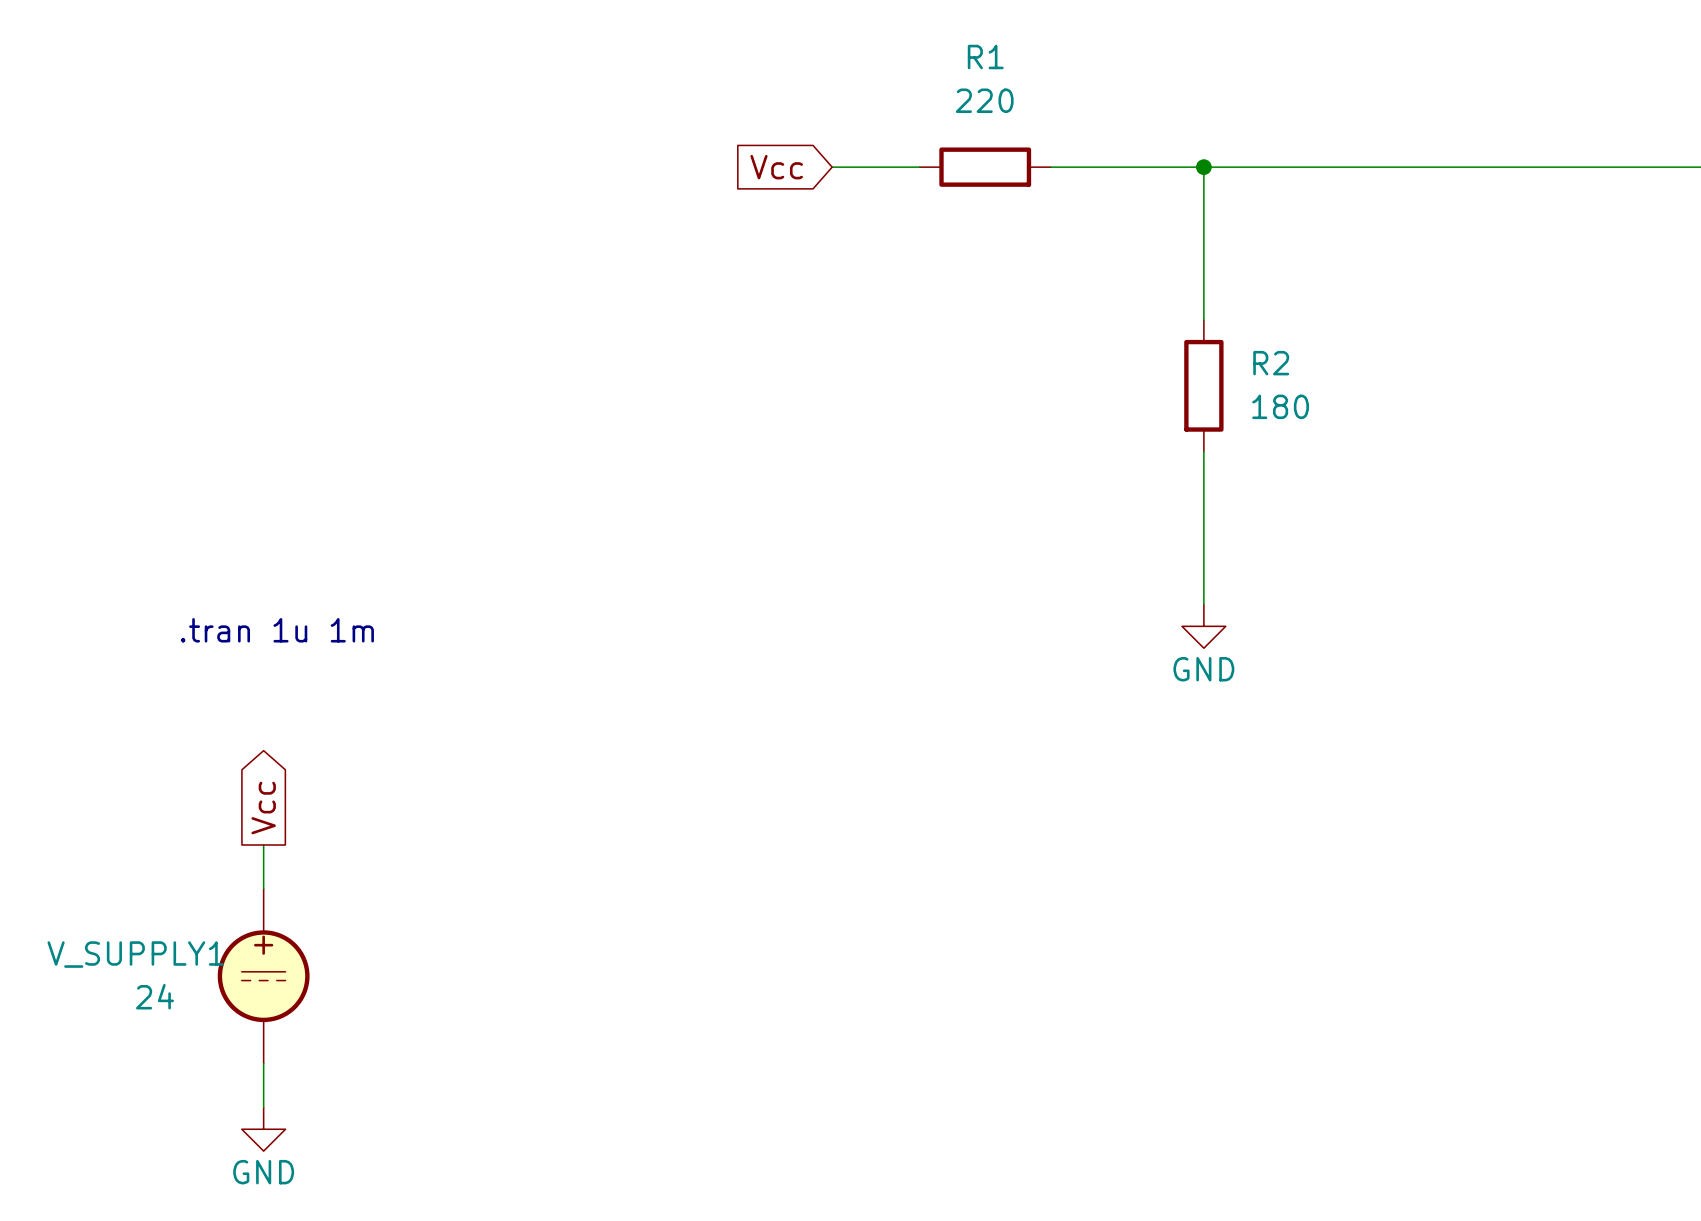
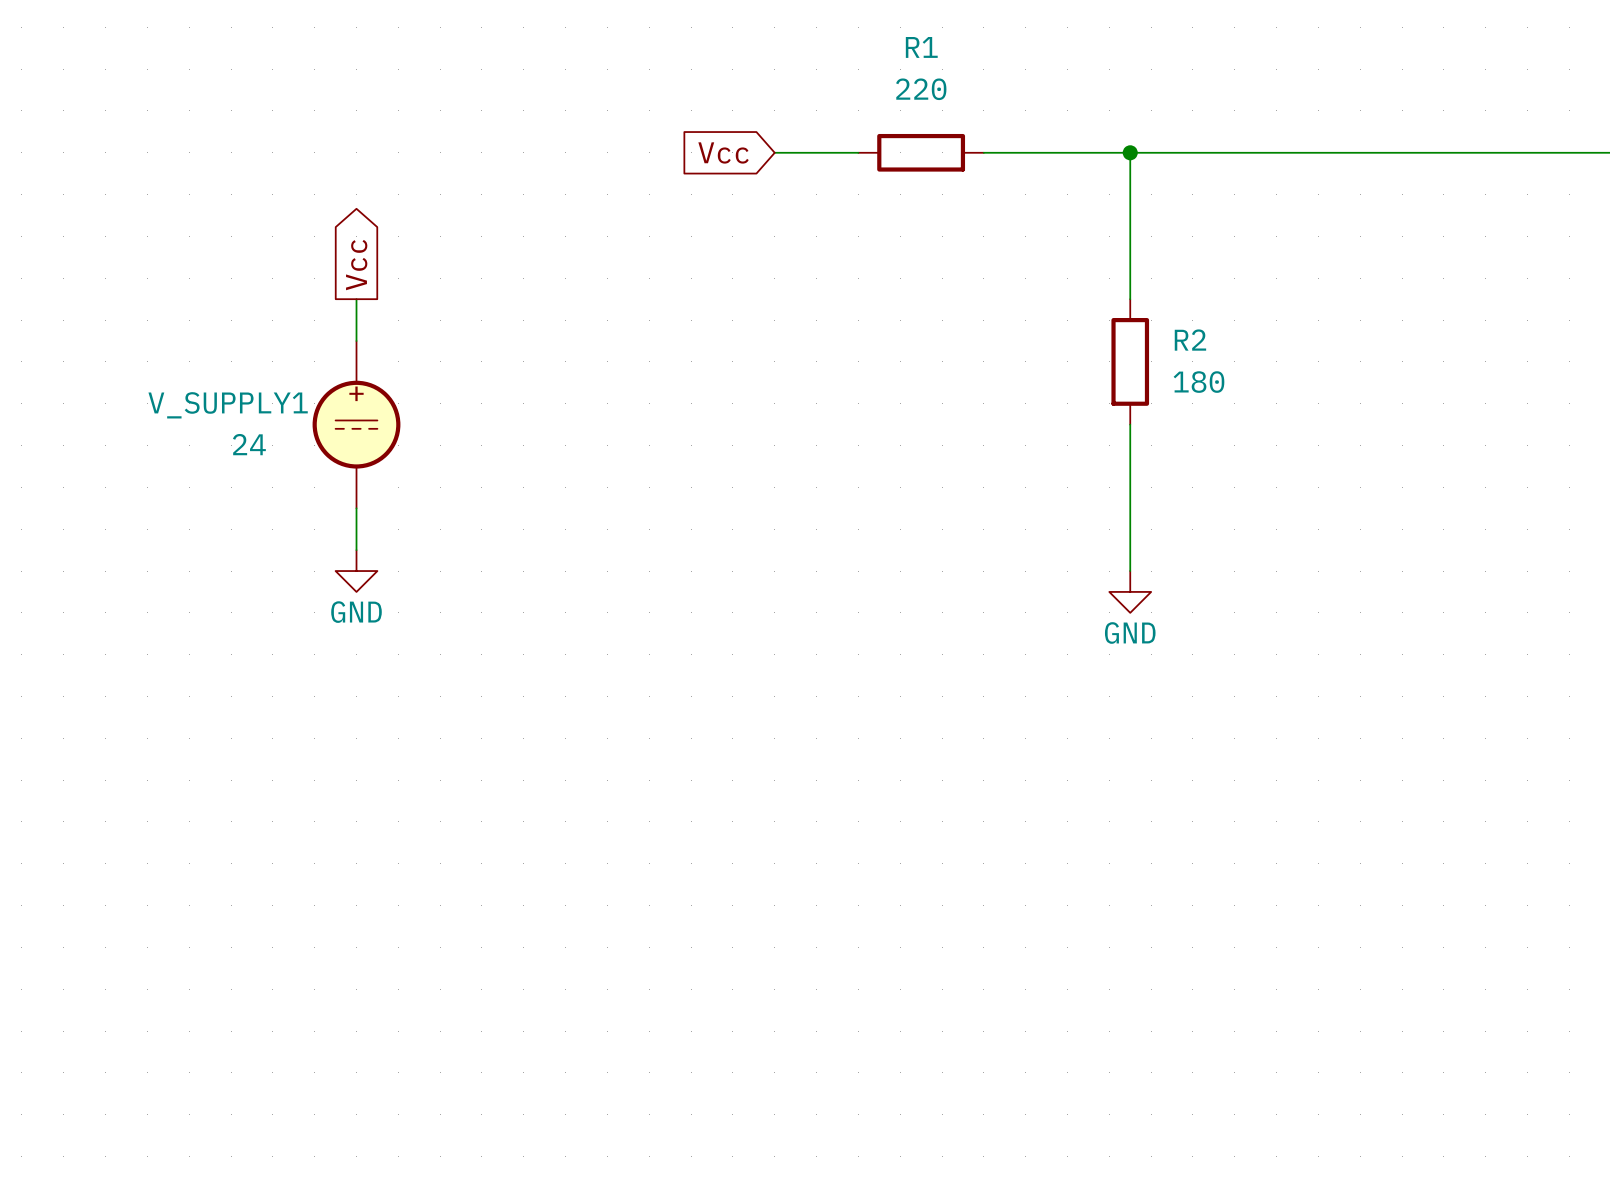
global label: none -> Vcc (356, 265)
wire: none -> (356, 299) (356, 341)
power symbol: none -> GND (356, 571)
text: .tran 1u 1m (277, 630) -> none
global label: Vcc (263, 807) -> none
wire: (263, 844) (263, 888) -> (356, 508) (356, 550)
V_SUPPLY1 position: (263, 976) -> (356, 424)
wire: (263, 1063) (263, 1107) -> none
power symbol: GND (263, 1129) -> none

